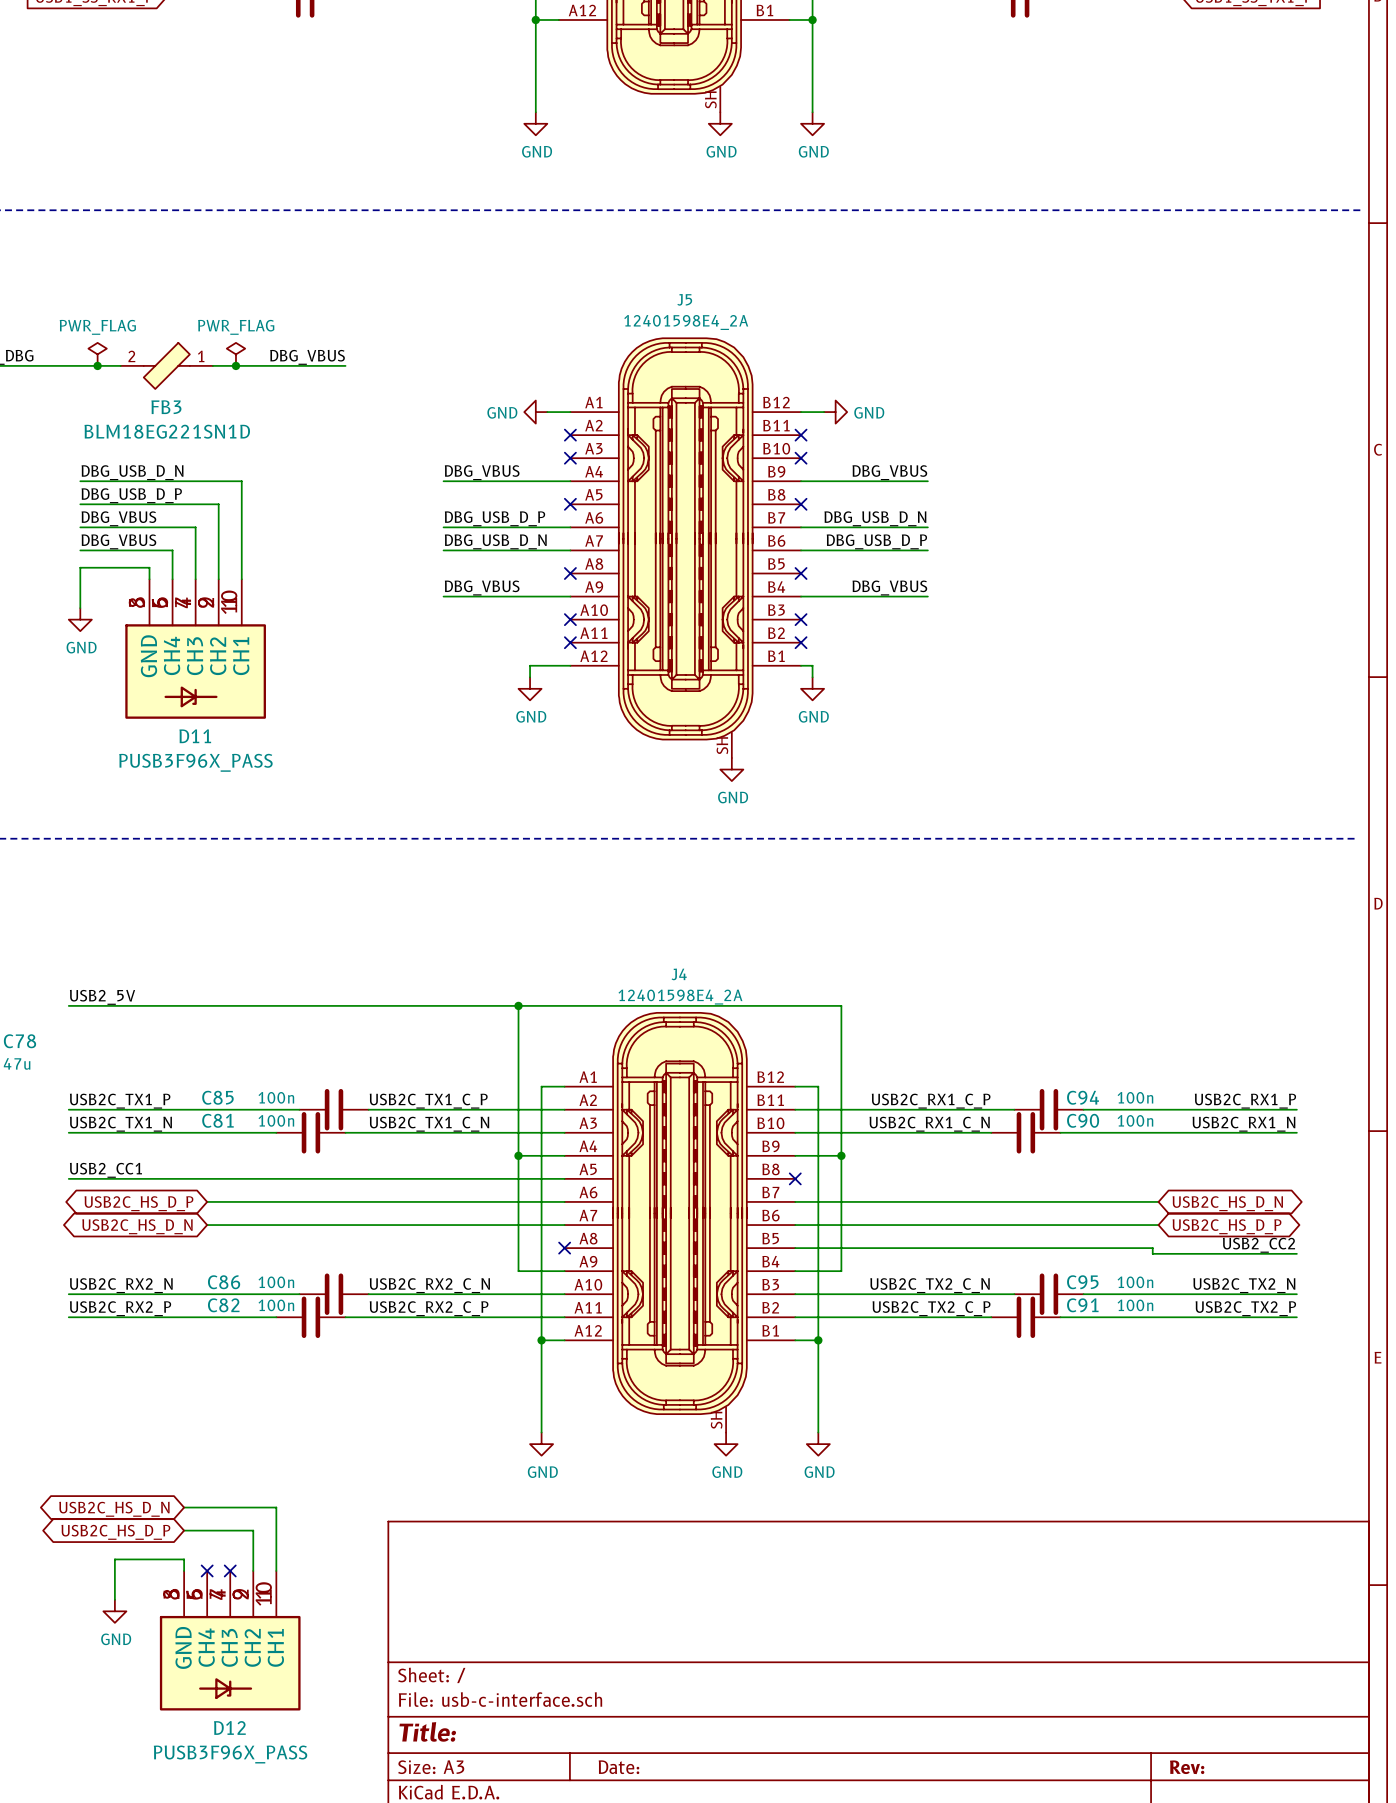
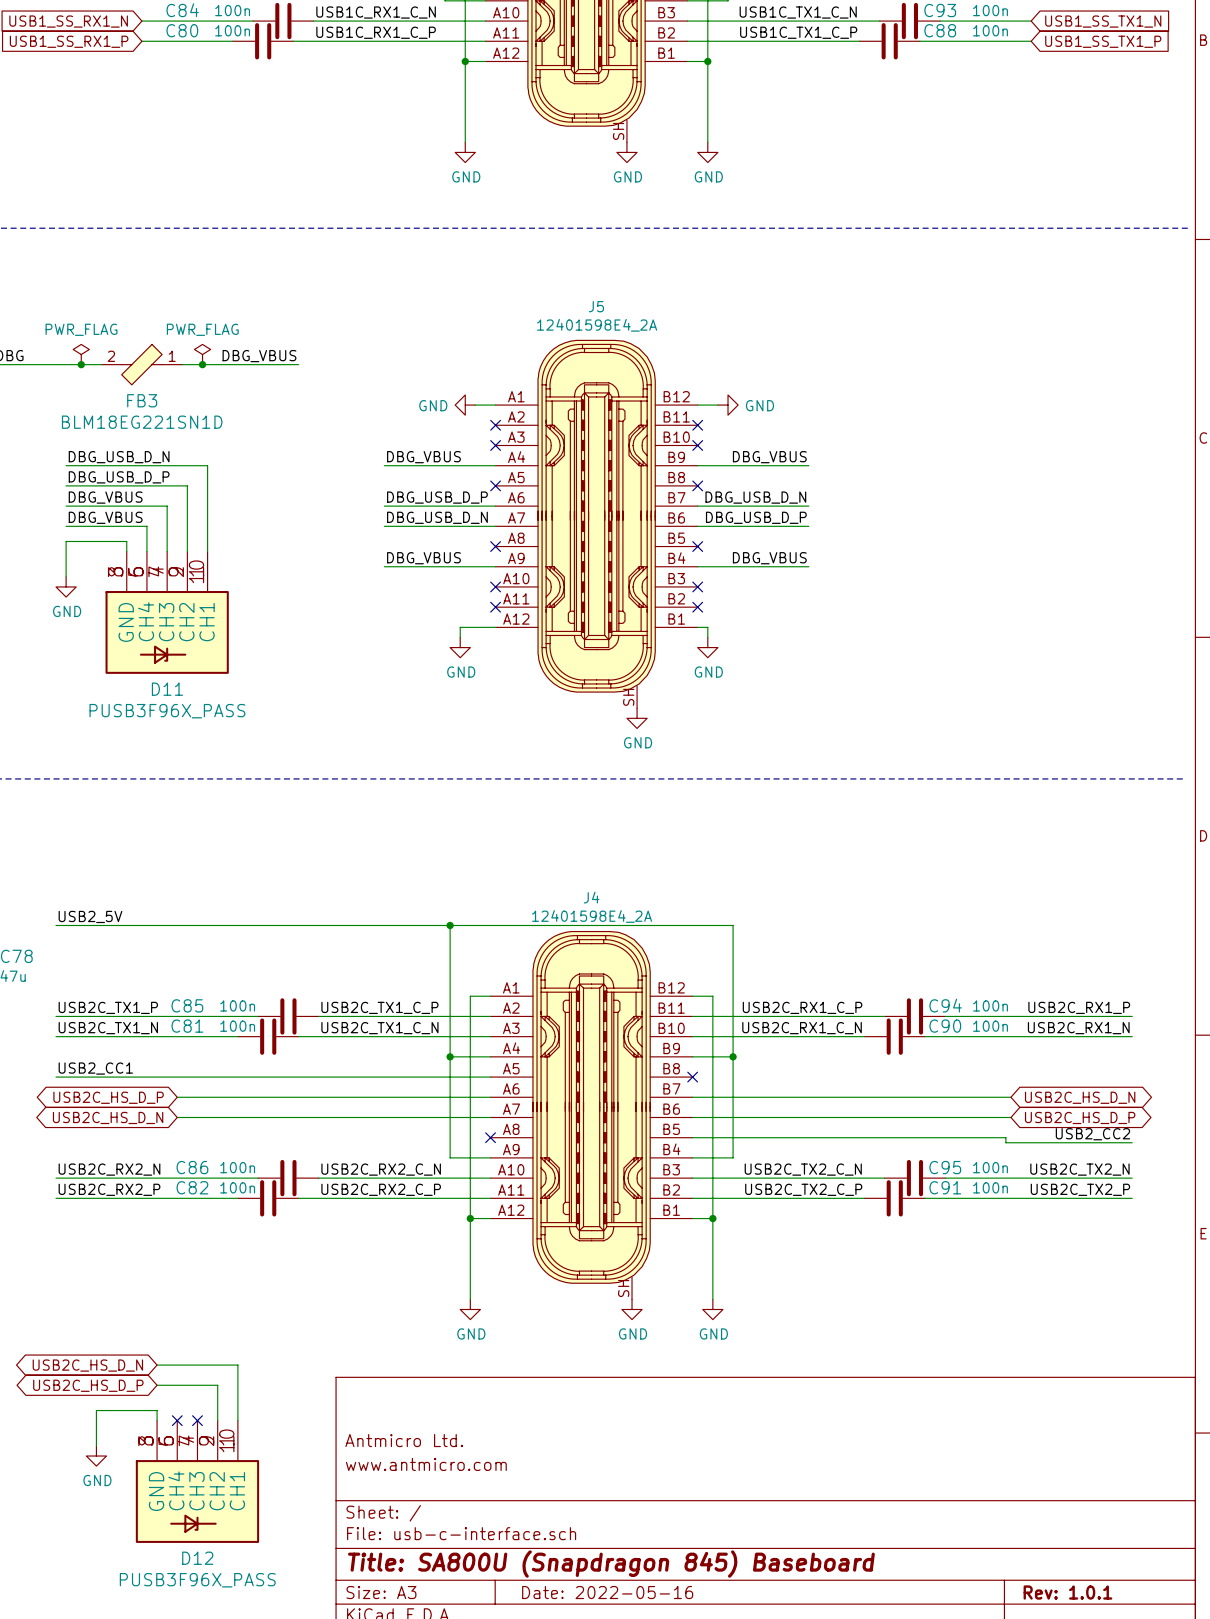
title block: none -> Antmicro Ltd. (404, 1440)
title block: none -> www.antmicro.com (426, 1464)
title block: Title: (427, 1731) -> Title: SA800U (Snapdragon 845) Baseboard (611, 1564)
title block: Date: (618, 1767) -> Date: 2022-05-16 (607, 1592)
title block: Rev: (1187, 1767) -> Rev: 1.0.1 (1067, 1592)

